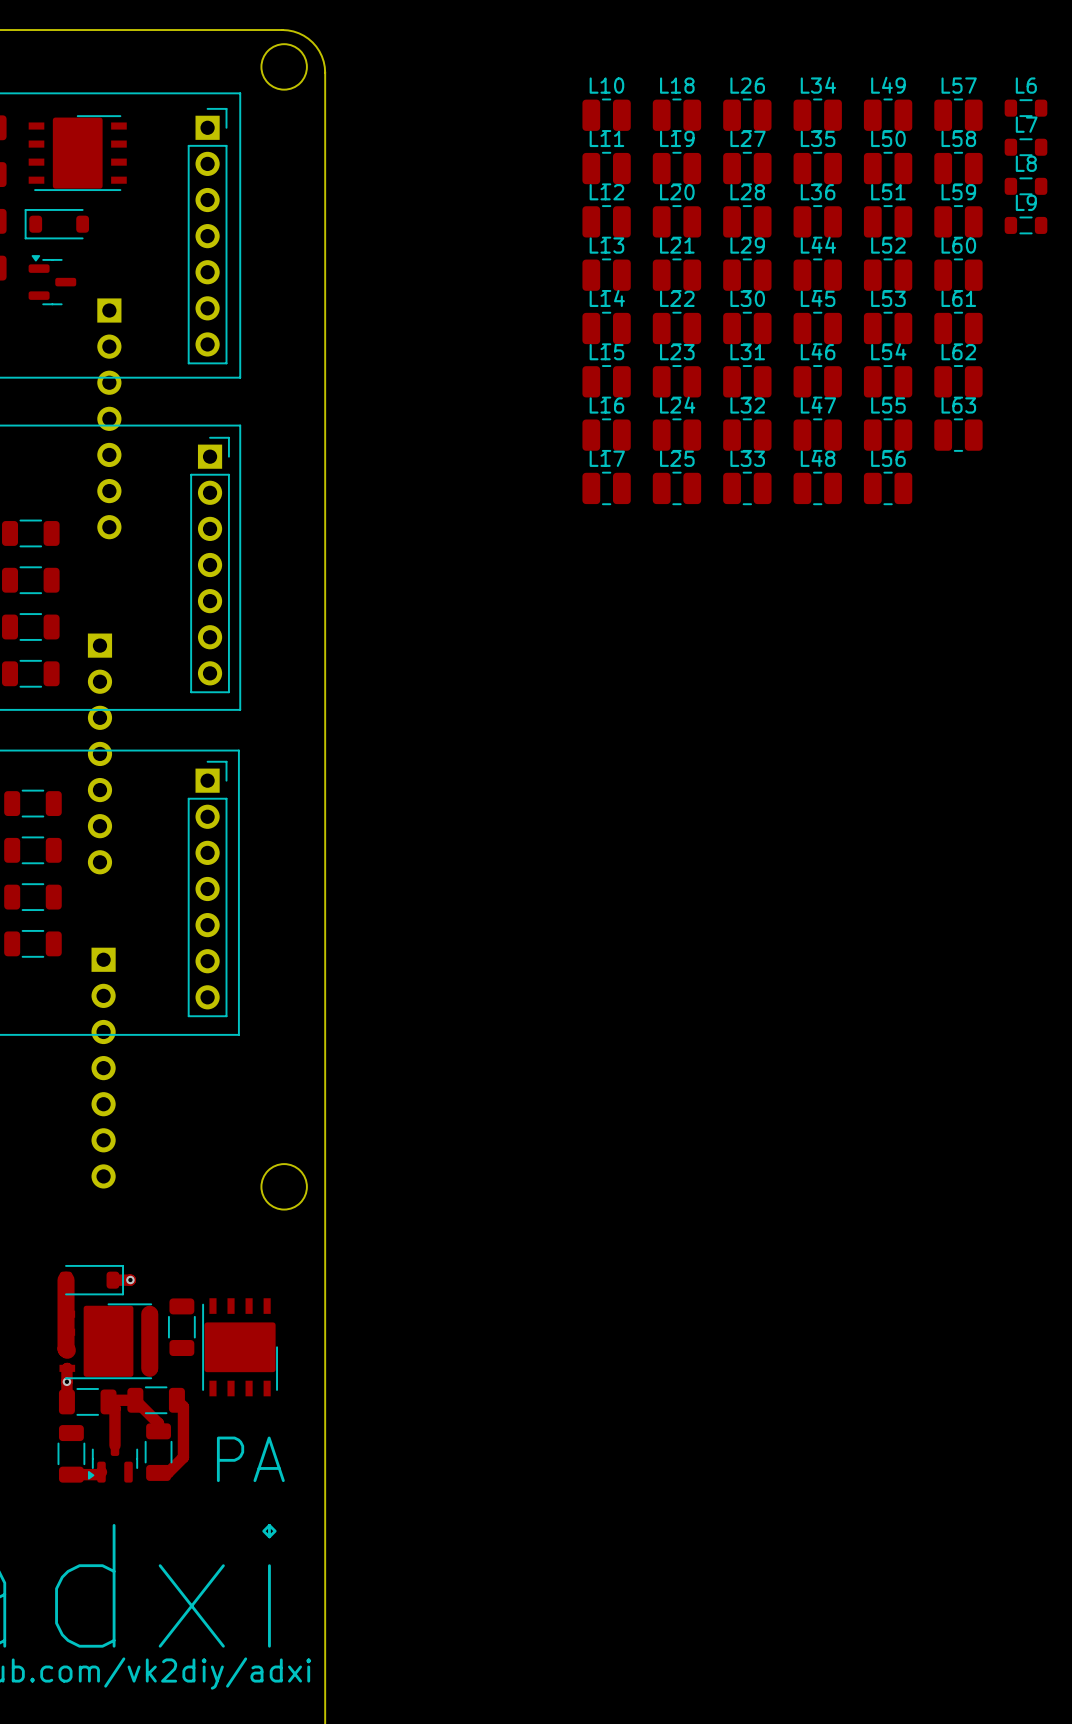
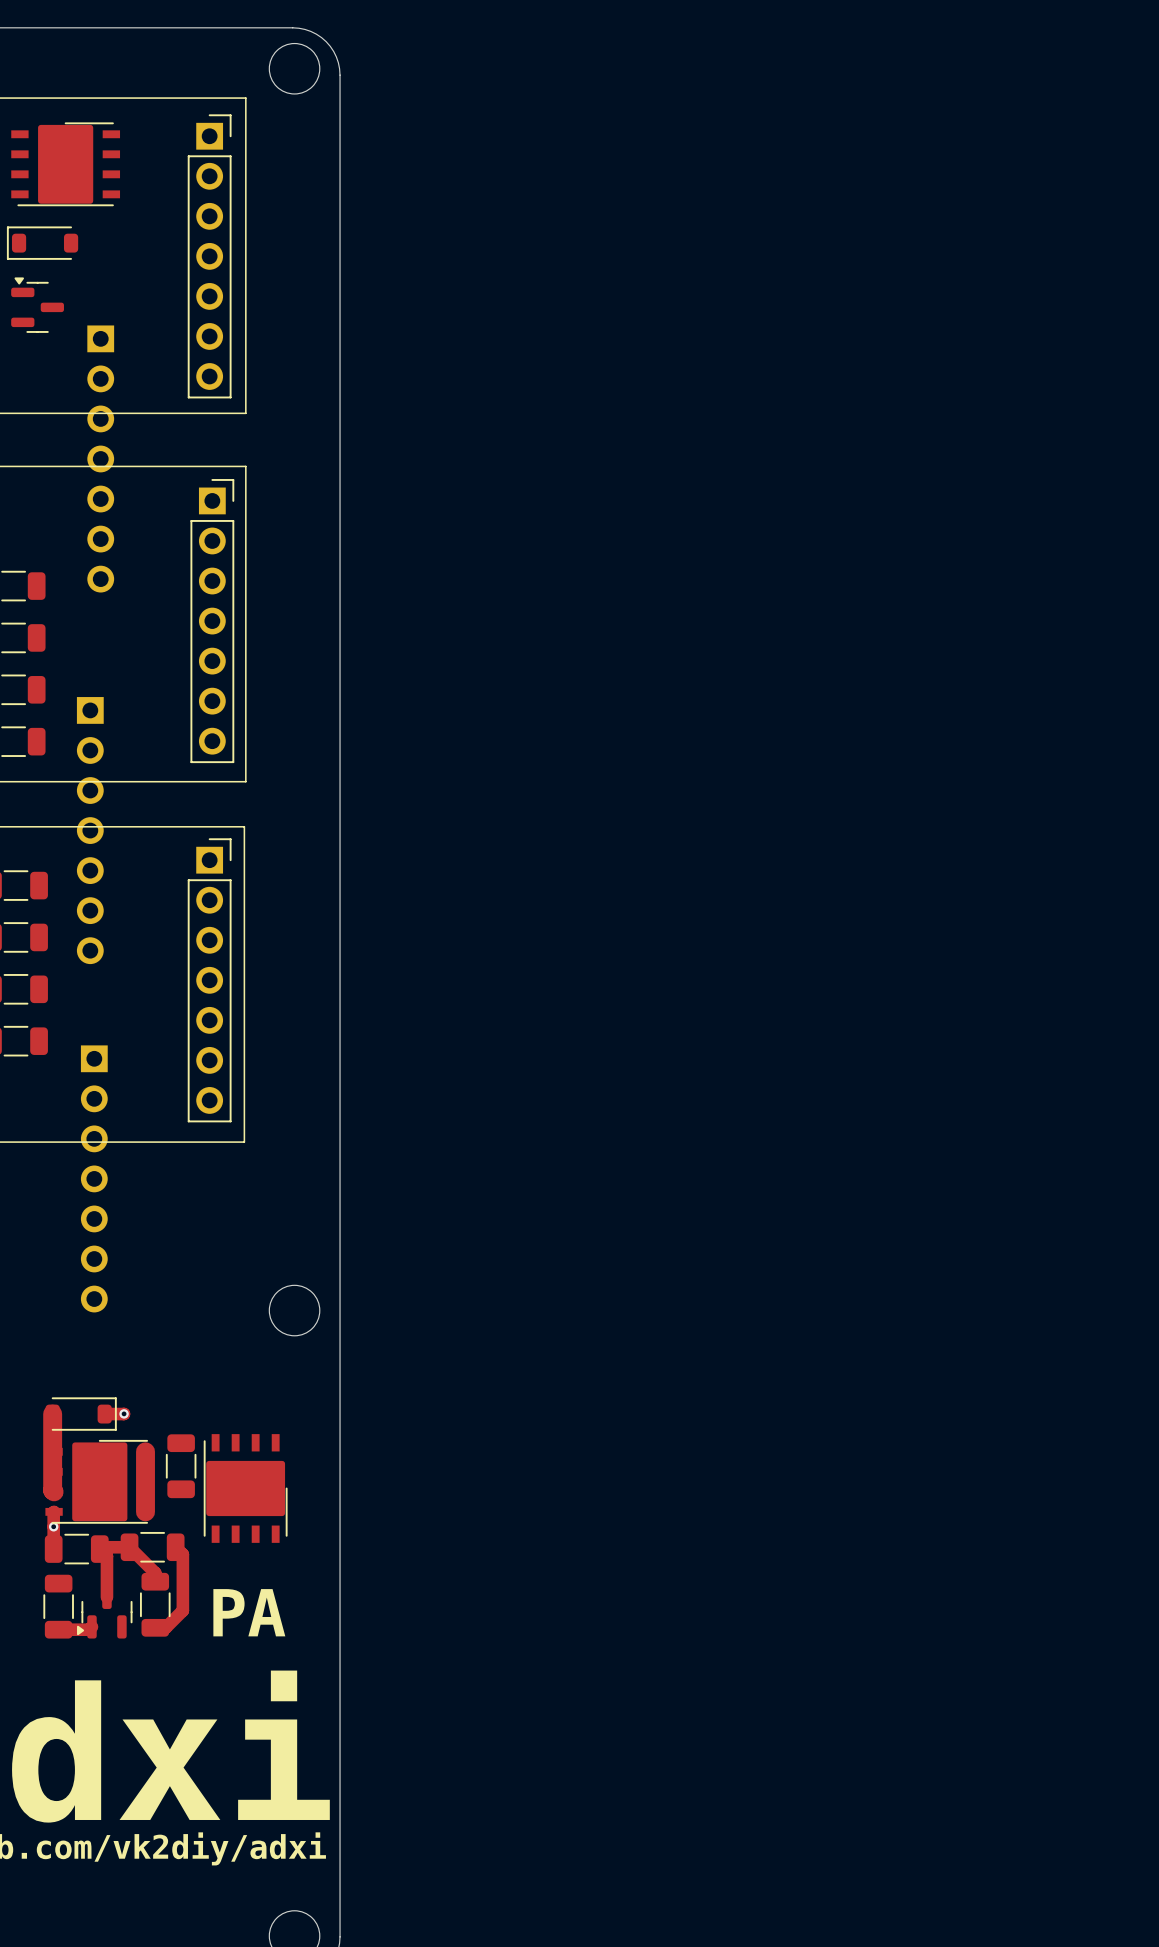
L6: (1025, 108) -> none
L10: (606, 115) -> none
L18: (676, 115) -> none
L26: (747, 115) -> none
L34: (817, 115) -> none
L49: (888, 115) -> none
L57: (958, 115) -> none
L7: (1025, 147) -> none
L11: (606, 168) -> none
L19: (676, 168) -> none
L27: (747, 168) -> none
L35: (817, 168) -> none
L50: (888, 168) -> none
L58: (958, 168) -> none
L8: (1025, 186) -> none
L12: (606, 221) -> none
L20: (676, 221) -> none
L28: (747, 221) -> none
L36: (817, 221) -> none
L51: (888, 221) -> none
L59: (958, 221) -> none
L9: (1025, 225) -> none
L13: (606, 275) -> none
L21: (676, 275) -> none
L29: (747, 275) -> none
L44: (817, 275) -> none
L52: (888, 275) -> none
L60: (958, 275) -> none
L14: (606, 328) -> none
L22: (676, 328) -> none
L30: (747, 328) -> none
L45: (817, 328) -> none
L53: (888, 328) -> none
L61: (958, 328) -> none
L15: (606, 381) -> none
L23: (676, 381) -> none
L31: (747, 381) -> none
L46: (817, 381) -> none
L54: (888, 381) -> none
L62: (958, 381) -> none
L16: (606, 435) -> none
L24: (676, 435) -> none
L32: (747, 435) -> none
L47: (817, 435) -> none
L55: (888, 435) -> none
L63: (958, 435) -> none
L17: (606, 488) -> none
L25: (676, 488) -> none
L33: (747, 488) -> none
L48: (817, 488) -> none
L56: (888, 488) -> none

